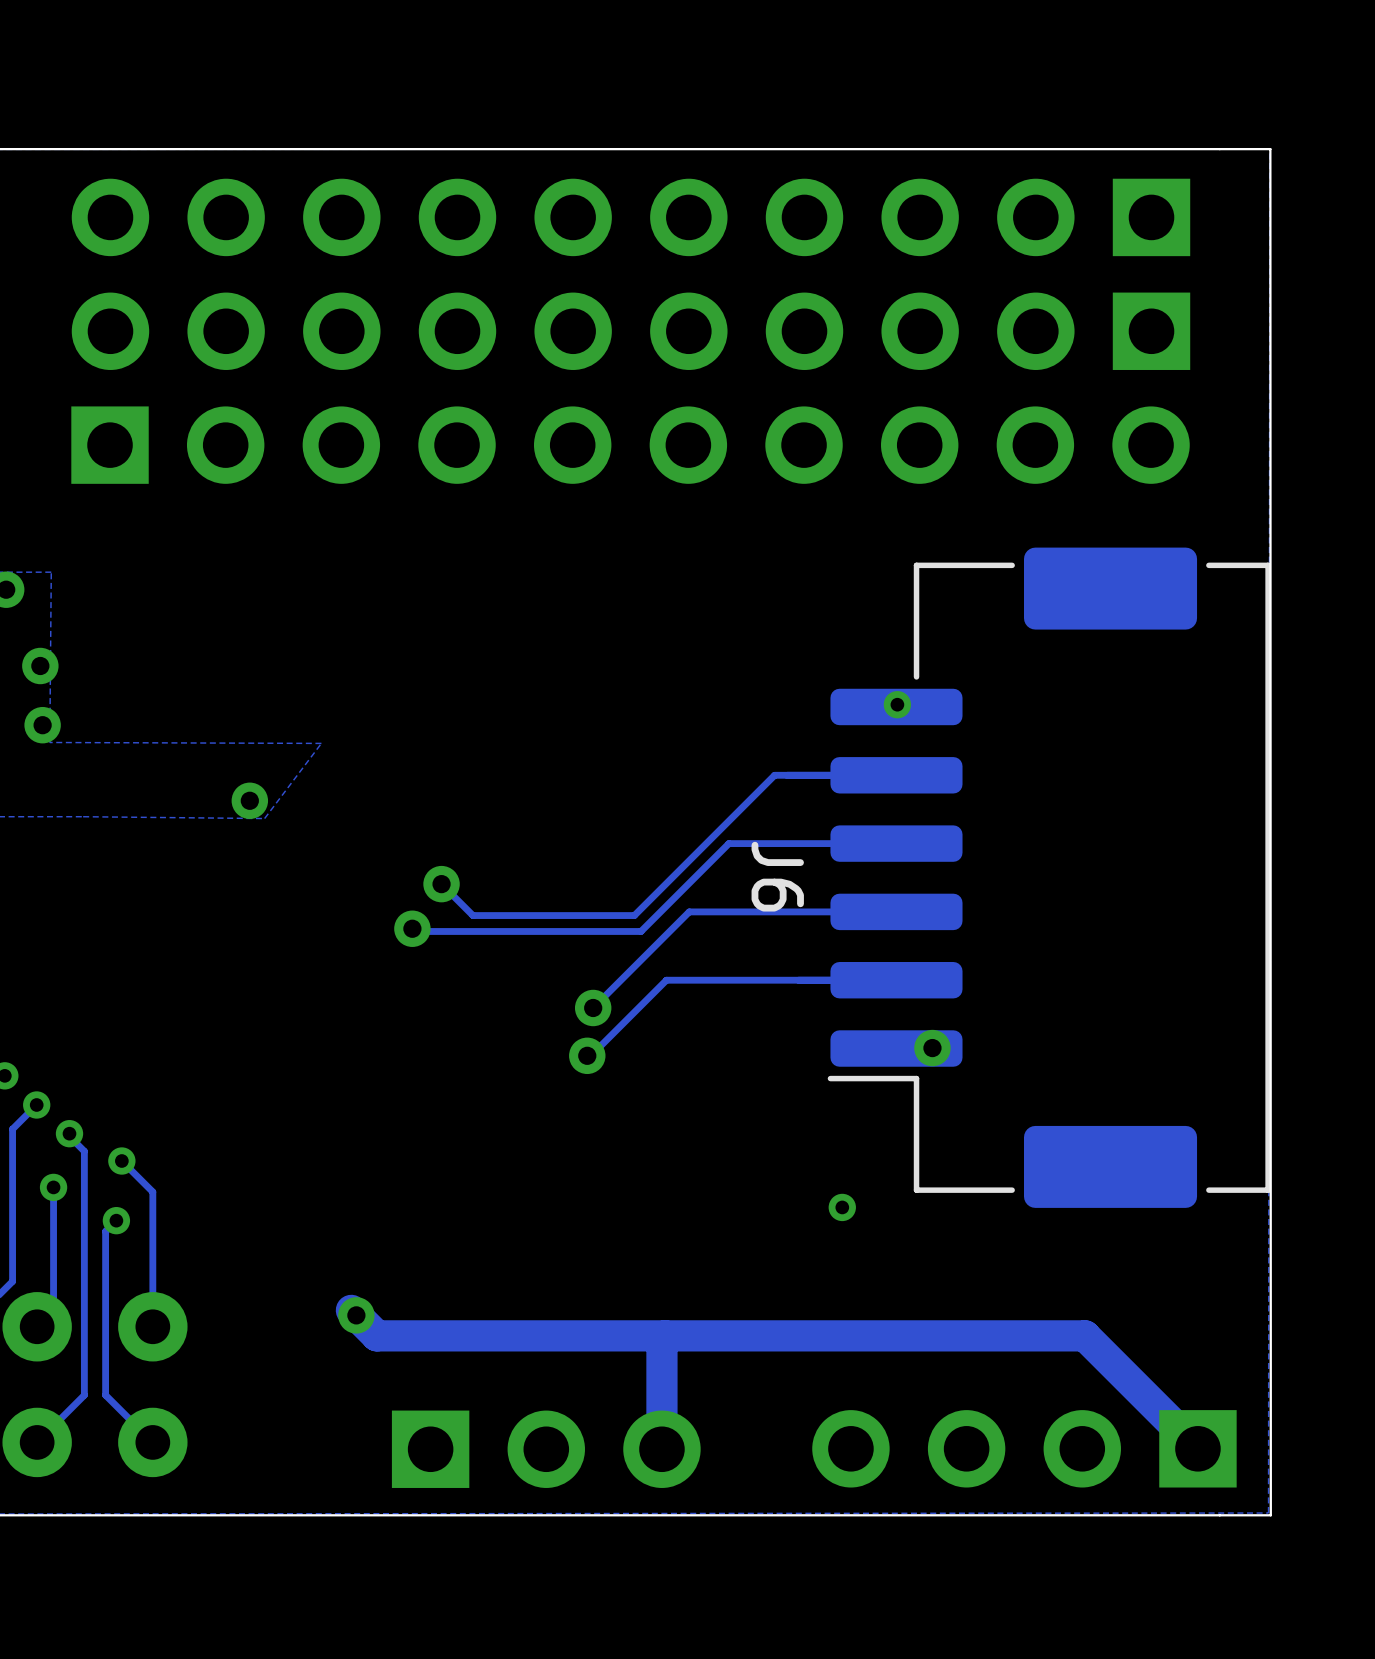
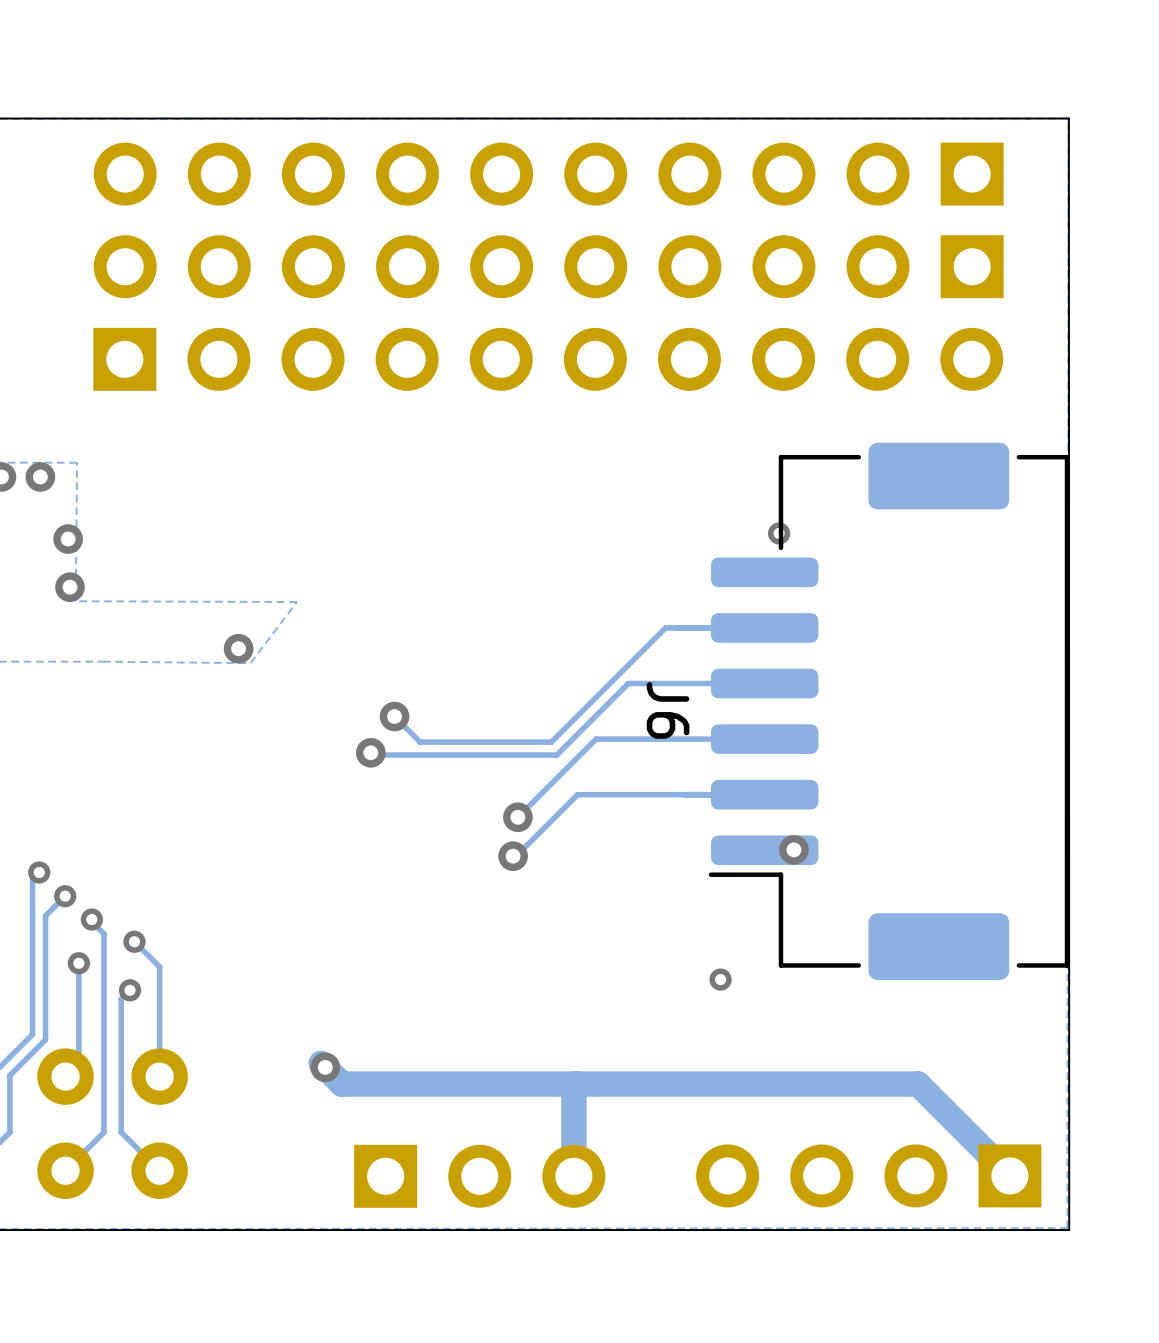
via position: (897, 704) -> (779, 533)

